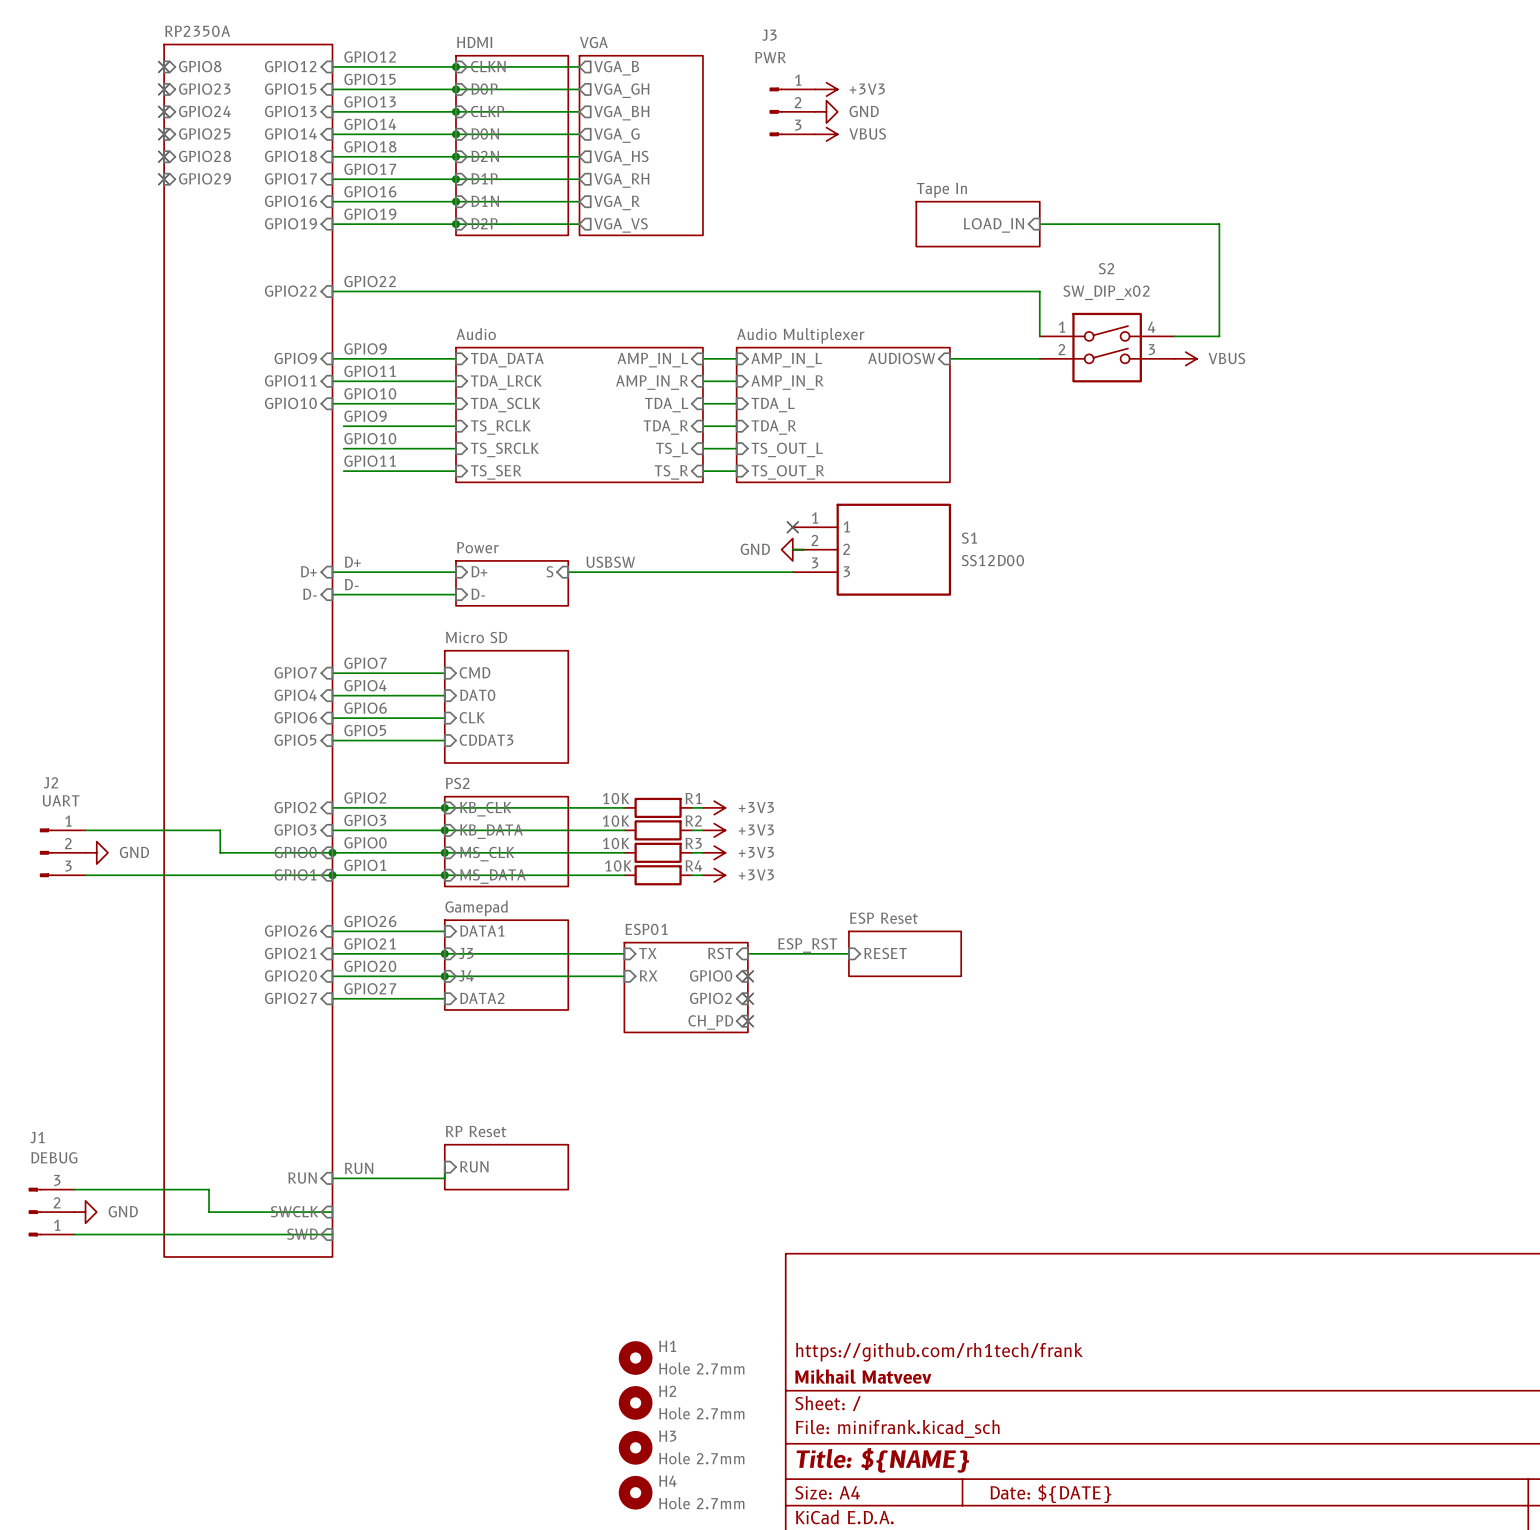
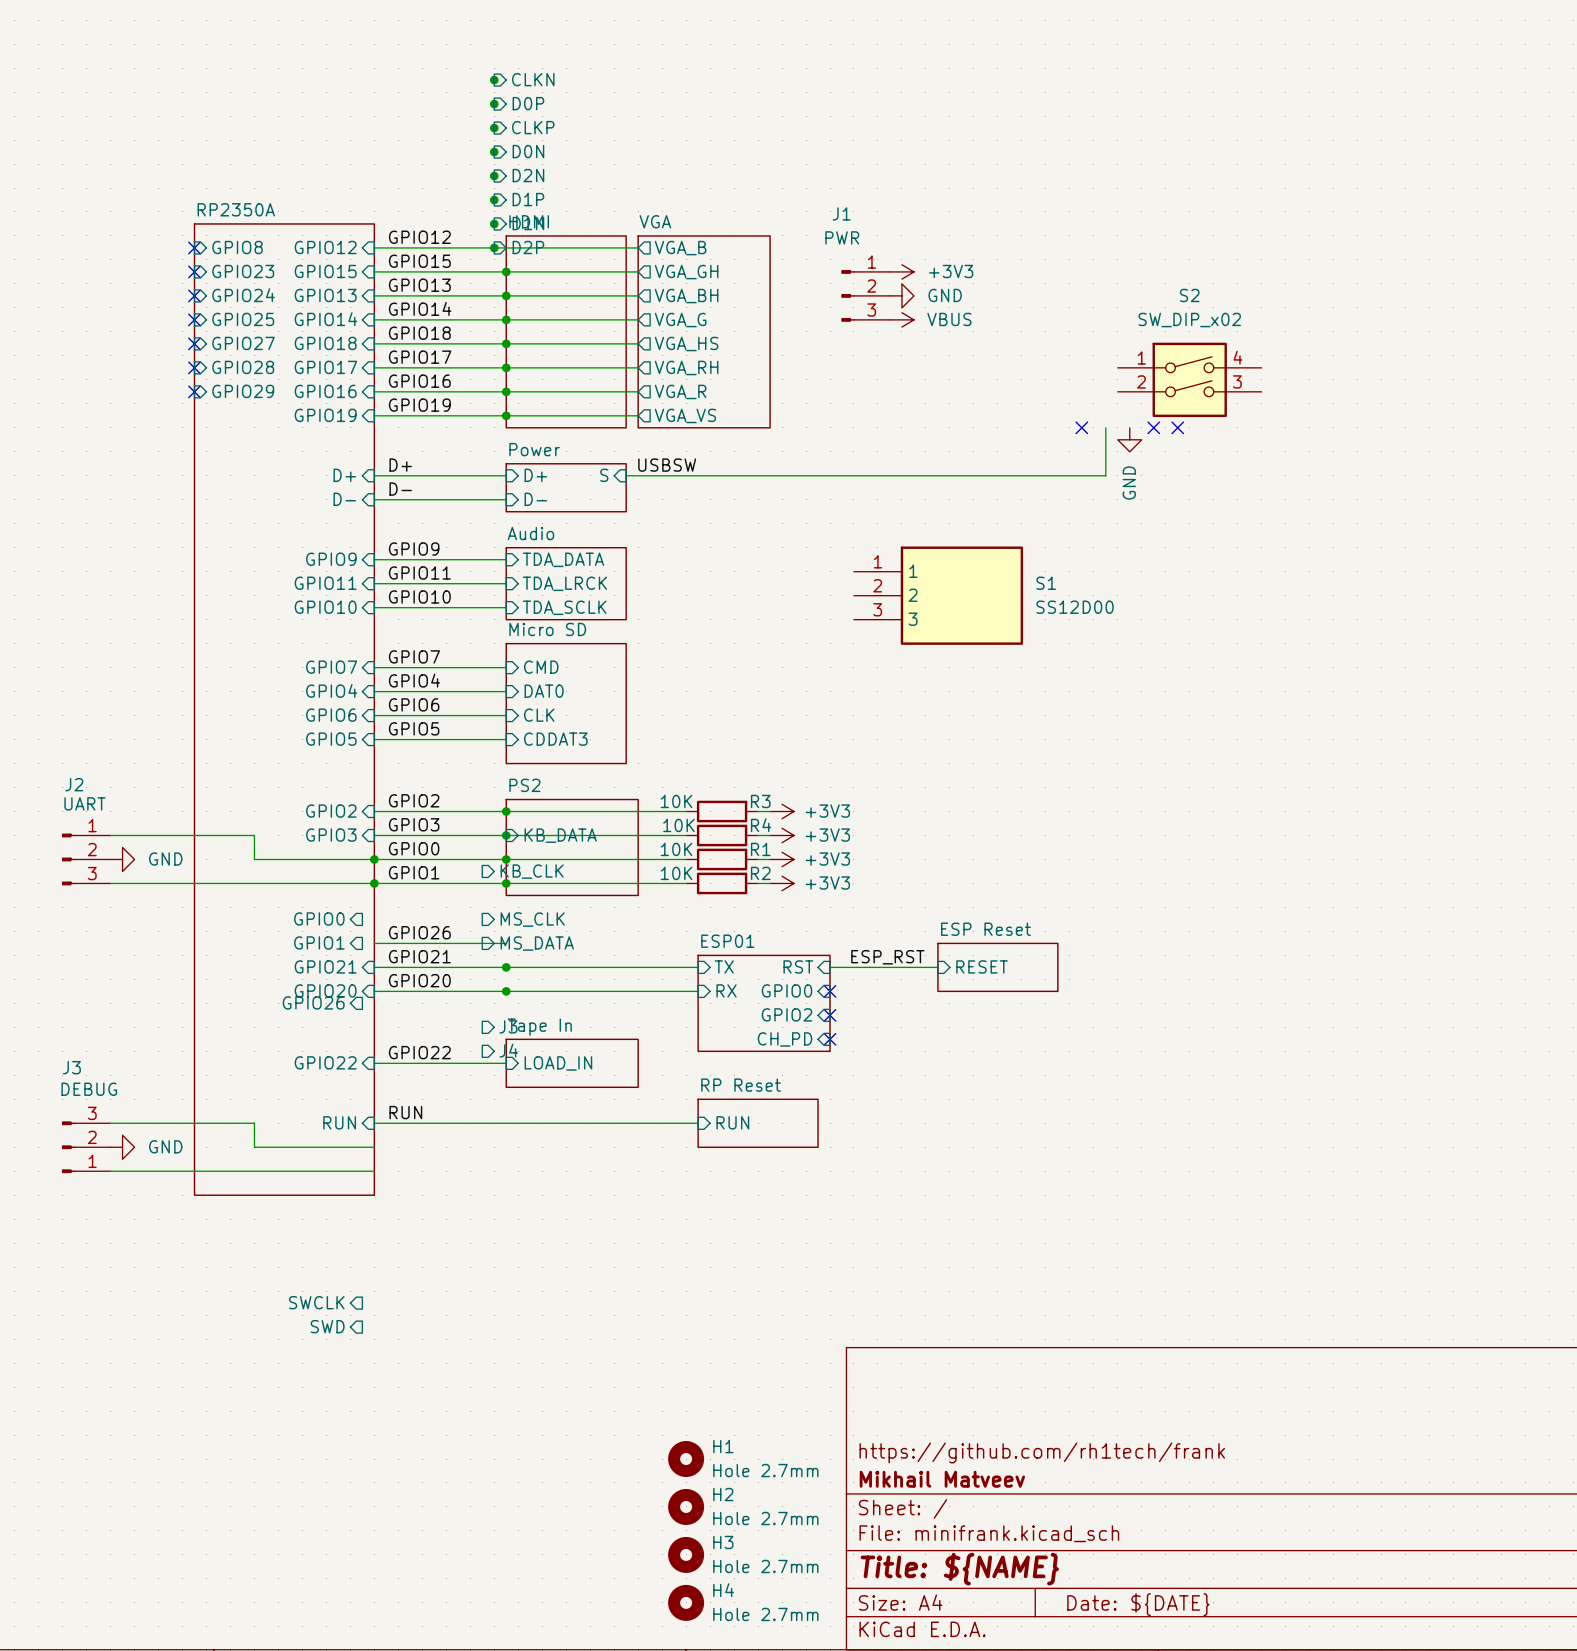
sheet RP2350A name position: RP2350A (197, 31) -> RP2350A (236, 209)
sheet RP2350A shape: [163, 43, 334, 1258] -> [193, 223, 376, 1196]
label position: GPIO12 (370, 57) -> GPIO12 (419, 237)
J3 value: PWR (770, 57) -> DEBUG (89, 1089)
no-connect mark: (164, 66) -> none
sheet pin position: GPIO8 (200, 66) -> GPIO8 (237, 247)
sheet pin position: GPIO12 (290, 66) -> GPIO12 (325, 247)
wire: (332, 66) (579, 66) -> none
sheet pin position: VGA_B (616, 68) -> VGA_B (680, 248)
label position: GPIO15 (370, 79) -> GPIO15 (419, 261)
no-connect mark: (164, 89) -> none
sheet pin position: GPIO23 (204, 89) -> GPIO23 (243, 271)
sheet pin position: GPIO15 (290, 89) -> GPIO15 (325, 271)
wire: (332, 89) (579, 89) -> none
power symbol position: +3V3 (826, 89) -> +3V3 (901, 271)
sheet pin position: VGA_GH (621, 90) -> VGA_GH (686, 272)
label position: GPIO13 (370, 101) -> GPIO13 (419, 285)
no-connect mark: (164, 111) -> none
sheet pin position: GPIO24 (204, 111) -> GPIO24 (243, 295)
sheet pin position: GPIO13 (290, 111) -> GPIO13 (325, 295)
wire: (332, 111) (579, 111) -> none
J3 flip: as is (775, 111) -> up-down (68, 1147)
J3 position: (792, 111) -> (86, 1147)
power symbol: GND (826, 111) -> none
sheet pin position: VGA_BH (621, 113) -> VGA_BH (686, 296)
label position: GPIO14 (370, 124) -> GPIO14 (420, 308)
sheet pin position: GPIO25 (204, 133) -> GPIO25 (243, 319)
sheet pin position: GPIO14 (290, 133) -> GPIO14 (325, 319)
no-connect mark: (164, 134) -> none
wire: (332, 134) (579, 134) -> (374, 271) (638, 271)
power symbol position: VBUS (826, 134) -> VBUS (901, 319)
sheet pin position: VGA_G (616, 135) -> VGA_G (680, 320)
sheet HDMI position: (512, 145) -> (566, 331)
sheet VGA position: (641, 145) -> (704, 331)
label position: GPIO18 (370, 146) -> GPIO18 (419, 333)
no-connect mark: (164, 156) -> none
sheet pin position: GPIO28 (205, 156) -> GPIO28 (243, 367)
sheet pin position: GPIO18 (291, 156) -> GPIO18 (325, 343)
wire: (332, 156) (579, 156) -> (374, 295) (638, 295)
sheet pin position: VGA_HS (621, 158) -> VGA_HS (686, 344)
label position: GPIO17 (370, 169) -> GPIO17 (420, 357)
sheet pin position: GPIO29 (204, 178) -> GPIO29 (243, 391)
sheet pin position: GPIO17 (290, 178) -> GPIO17 (325, 367)
no-connect mark: (164, 179) -> none
wire: (332, 179) (579, 179) -> (374, 367) (638, 367)
sheet pin position: VGA_RH (621, 180) -> VGA_RH (686, 367)
label position: GPIO16 (370, 191) -> GPIO16 (419, 381)
sheet pin position: GPIO16 (290, 201) -> GPIO16 (325, 391)
wire: (332, 201) (579, 201) -> (374, 343) (638, 343)
sheet pin position: VGA_R (617, 202) -> VGA_R (680, 391)
label position: GPIO19 (370, 214) -> GPIO19 (419, 405)
sheet pin position: GPIO19 (290, 223) -> GPIO19 (325, 415)
no-connect mark: none -> (194, 247)
wire: (332, 224) (343, 224) -> none
wire: none -> (626, 247) (638, 247)
sheet Tape In: (978, 224) -> none
wire: (1039, 224) (1219, 224) (1219, 336) (1174, 336) -> none
sheet pin position: VGA_VS (620, 225) -> VGA_VS (685, 415)
sheet pin: LOAD_IN (993, 225) -> none
no-connect mark: none -> (194, 271)
junction: none -> (506, 271)
no-connect mark: none -> (194, 295)
junction: none -> (506, 295)
power symbol: none -> GND (901, 295)
label: GPIO22 (370, 281) -> none
no-connect mark: none -> (194, 319)
sheet pin: GPIO22 (290, 291) -> GPIO27 (243, 343)
wire: (332, 291) (343, 291) -> none
junction: none -> (506, 319)
wire: (590, 291) (1039, 291) (1039, 336) -> none
no-connect mark: none -> (194, 343)
junction: none -> (506, 343)
no-connect mark: none -> (194, 367)
junction: none -> (506, 367)
label: GPIO9 (365, 348) -> none
no-connect mark: none -> (194, 391)
sheet pin position: GPIO9 (295, 358) -> GPIO9 (331, 559)
wire: (332, 358) (343, 358) -> none
wire: none -> (494, 391) (638, 391)
junction: none -> (506, 391)
wire: (702, 358) (736, 358) -> none
sheet pin: AUDIOSW (901, 358) -> none
wire: (949, 358) (1039, 358) -> none
power symbol: VBUS (1185, 358) -> none
sheet pin position: TDA_DATA (507, 360) -> TDA_DATA (563, 559)
sheet pin: AMP_IN_L (652, 360) -> none
sheet pin: AMP_IN_L (786, 360) -> none
label: GPIO11 (370, 371) -> none
sheet pin position: GPIO11 (290, 380) -> GPIO11 (325, 583)
wire: (332, 381) (343, 381) -> none
wire: none -> (494, 415) (638, 415)
junction: none -> (506, 415)
wire: (702, 381) (736, 381) -> none
sheet pin position: TDA_LRCK (506, 382) -> TDA_LRCK (564, 583)
sheet pin: AMP_IN_R (652, 382) -> none
sheet pin: AMP_IN_R (787, 382) -> none
no-connect mark: none -> (1081, 427)
wire: none -> (1105, 427) (1105, 475) (626, 475)
no-connect mark: none -> (1153, 427)
no-connect mark: none -> (1177, 427)
label: GPIO10 (370, 393) -> none
sheet pin position: GPIO10 (290, 403) -> GPIO10 (325, 607)
wire: (332, 403) (456, 403) -> (374, 607) (506, 607)
wire: (702, 403) (736, 403) -> none
power symbol: none -> GND (1129, 439)
sheet pin position: TDA_SCLK (505, 405) -> TDA_SCLK (564, 607)
sheet pin: TDA_L (666, 405) -> none
sheet pin: TDA_L (773, 405) -> none
sheet Audio: (579, 414) -> none
sheet Audio Multiplexer: (843, 414) -> none
label: GPIO9 (365, 416) -> none
wire: (343, 426) (456, 426) -> none
wire: (702, 426) (736, 426) -> none
sheet pin: TS_RCLK (500, 427) -> none
sheet pin: TDA_R (665, 427) -> none
sheet pin: TDA_R (773, 427) -> none
sheet pin: none -> D+ (344, 475)
wire: none -> (374, 475) (506, 475)
sheet pin: none -> D+ (535, 475)
label: GPIO10 (370, 438) -> none
wire: (343, 448) (456, 448) -> none
wire: (702, 448) (736, 448) -> none
sheet pin: TS_SRCLK (504, 449) -> none
sheet pin: TS_L (672, 449) -> none
sheet pin: TS_OUT_L (787, 449) -> none
sheet pin: none -> D- (344, 499)
wire: none -> (374, 499) (506, 499)
sheet pin: none -> D- (535, 499)
label position: GPIO11 (370, 461) -> GPIO11 (419, 572)
wire: (343, 471) (456, 471) -> none
wire: (702, 471) (736, 471) -> none
sheet pin: TS_SER (496, 472) -> none
sheet pin: TS_R (671, 472) -> none
sheet pin: TS_OUT_R (787, 472) -> none
label: none -> GPIO9 (414, 549)
no-connect mark: (792, 527) -> none
sheet Audio: none -> (566, 583)
power symbol: GND (792, 549) -> none
label: none -> GPIO10 (419, 596)
label position: D+ (352, 562) -> D+ (400, 465)
label position: USBSW (610, 562) -> USBSW (667, 465)
sheet pin: D+ (308, 571) -> none
sheet pin: D+ (479, 571) -> none
sheet pin position: S (549, 571) -> S (604, 475)
wire: (332, 572) (456, 572) -> (374, 559) (506, 559)
wire: (568, 572) (792, 572) -> none
sheet Power position: (512, 583) -> (566, 487)
label position: D- (351, 584) -> D- (400, 489)
sheet pin: D- (310, 594) -> none
wire: (332, 594) (456, 594) -> (374, 583) (506, 583)
sheet pin: D- (478, 594) -> none
wire: none -> (374, 667) (506, 667)
wire: none -> (374, 691) (506, 691)
sheet Micro SD: none -> (566, 703)
wire: none -> (374, 715) (506, 715)
label position: GPIO7 (365, 663) -> GPIO7 (414, 656)
sheet pin position: GPIO7 (295, 672) -> GPIO7 (331, 667)
sheet pin position: CMD (475, 672) -> CMD (541, 667)
wire: (332, 673) (444, 673) -> none
wire: none -> (374, 739) (506, 739)
label position: GPIO4 (365, 685) -> GPIO4 (414, 680)
sheet pin position: GPIO4 (295, 695) -> GPIO4 (331, 690)
wire: (332, 695) (444, 695) -> none
sheet pin position: DAT0 (477, 695) -> DAT0 (544, 691)
sheet Micro SD: (506, 706) -> none
label position: GPIO6 (365, 708) -> GPIO6 (414, 704)
sheet pin position: GPIO6 (295, 717) -> GPIO6 (331, 715)
sheet pin position: CLK (472, 717) -> CLK (539, 715)
wire: (332, 718) (444, 718) -> none
label position: GPIO5 (365, 730) -> GPIO5 (414, 728)
sheet pin position: GPIO5 (295, 740) -> GPIO5 (331, 739)
wire: (332, 740) (444, 740) -> none
sheet pin position: CDDAT3 (486, 740) -> CDDAT3 (555, 739)
junction: none -> (506, 811)
power symbol: none -> +3V3 (782, 811)
junction: none -> (506, 835)
power symbol: none -> +3V3 (782, 835)
junction: none -> (374, 859)
junction: none -> (506, 859)
power symbol: none -> +3V3 (782, 859)
label position: GPIO2 (365, 797) -> GPIO2 (414, 800)
sheet pin position: GPIO2 (295, 807) -> GPIO2 (331, 811)
wire: (332, 807) (624, 807) -> (374, 811) (686, 811)
junction: (444, 807) -> none
R1 position: (658, 807) -> (722, 859)
wire: (691, 807) (702, 807) -> (758, 811) (770, 811)
power symbol: +3V3 (714, 807) -> none
wire: none -> (110, 883) (686, 883)
junction: none -> (374, 883)
junction: none -> (506, 883)
power symbol: none -> +3V3 (782, 883)
label position: GPIO3 (365, 820) -> GPIO3 (414, 824)
wire: (85, 830) (220, 830) (220, 852) (624, 852) -> (110, 835) (254, 835) (254, 859) (686, 859)
sheet pin position: GPIO3 (295, 830) -> GPIO3 (331, 835)
wire: (332, 830) (624, 830) -> (374, 835) (686, 835)
junction: (444, 830) -> none
R2 position: (658, 830) -> (722, 883)
wire: (691, 830) (702, 830) -> (758, 835) (770, 835)
power symbol: +3V3 (714, 830) -> none
sheet pin position: KB_DATA (491, 831) -> KB_DATA (560, 835)
sheet PS2 position: (506, 841) -> (572, 847)
label position: GPIO0 (365, 842) -> GPIO0 (414, 848)
J2 position: (62, 852) -> (86, 859)
power symbol position: GND (96, 852) -> GND (122, 859)
junction: (332, 852) -> none
junction: (444, 852) -> none
R3 position: (658, 852) -> (722, 811)
wire: (691, 852) (702, 852) -> (758, 859) (770, 859)
power symbol: +3V3 (714, 852) -> none
label position: GPIO1 (365, 865) -> GPIO1 (414, 872)
wire: (85, 875) (343, 875) -> none
junction: (332, 875) -> none
junction: (444, 875) -> none
wire: (467, 875) (624, 875) -> none
R4 position: (658, 875) -> (722, 835)
wire: (691, 875) (702, 875) -> (758, 883) (770, 883)
power symbol: +3V3 (714, 875) -> none
wire: none -> (374, 967) (698, 967)
junction: none -> (506, 967)
wire: none -> (374, 991) (698, 991)
junction: none -> (506, 991)
no-connect mark: none -> (830, 991)
label position: GPIO26 (370, 921) -> GPIO26 (419, 932)
sheet pin: DATA1 (482, 930) -> none
wire: (332, 931) (444, 931) -> none
no-connect mark: none -> (830, 1015)
label position: GPIO21 (370, 943) -> GPIO21 (419, 956)
label position: ESP_RST (807, 945) -> ESP_RST (887, 957)
sheet pin position: GPIO21 (290, 953) -> GPIO21 (325, 966)
wire: (332, 953) (624, 953) -> none
junction: (444, 953) -> none
sheet pin position: TX (647, 953) -> TX (724, 966)
sheet pin position: RST (720, 953) -> RST (798, 966)
wire: (747, 953) (848, 953) -> (830, 967) (937, 967)
sheet pin position: RESET (885, 953) -> RESET (982, 966)
sheet ESP Reset position: (905, 953) -> (997, 967)
sheet Gamepad: (506, 965) -> none
no-connect mark: none -> (830, 1039)
label position: GPIO20 (370, 966) -> GPIO20 (419, 980)
sheet pin position: GPIO20 (290, 975) -> GPIO20 (325, 990)
sheet pin position: RX (648, 975) -> RX (726, 990)
sheet pin position: GPIO0 (711, 975) -> GPIO0 (786, 990)
wire: (332, 976) (624, 976) -> none
junction: (444, 976) -> none
no-connect mark: (747, 976) -> none
wire: none -> (374, 1063) (506, 1063)
sheet Tape In: none -> (572, 1063)
sheet ESP01 position: (686, 987) -> (764, 1003)
label: GPIO27 (370, 988) -> GPIO22 (419, 1052)
sheet pin: none -> LOAD_IN (558, 1063)
sheet pin: GPIO27 (290, 998) -> GPIO22 (325, 1062)
wire: (332, 998) (444, 998) -> none
sheet pin: DATA2 (482, 998) -> none
sheet pin position: GPIO2 (710, 998) -> GPIO2 (786, 1014)
no-connect mark: (747, 998) -> none
no-connect mark: (747, 1021) -> none
sheet pin position: CH_PD (710, 1022) -> CH_PD (784, 1039)
wire: none -> (110, 1123) (254, 1123) (254, 1147) (374, 1147)
sheet pin: none -> RUN (339, 1122)
wire: none -> (374, 1123) (698, 1123)
sheet pin: none -> RUN (732, 1122)
sheet RP Reset: none -> (758, 1123)
power symbol: none -> GND (122, 1147)
wire: none -> (110, 1171) (374, 1171)
J1 value: DEBUG (54, 1157) -> PWR (842, 237)
sheet pin: RUN (474, 1166) -> none
wire: (444, 1167) (444, 1178) (332, 1178) -> none
sheet RP Reset: (506, 1167) -> none
label position: RUN (359, 1168) -> RUN (405, 1112)
sheet pin: RUN (302, 1178) -> none
wire: (74, 1189) (209, 1189) (209, 1212) (332, 1212) -> none
J1 flip: as is (35, 1212) -> up-down (847, 295)
J1 position: (51, 1212) -> (865, 295)
power symbol: GND (85, 1212) -> none
wire: (74, 1234) (332, 1234) -> none

